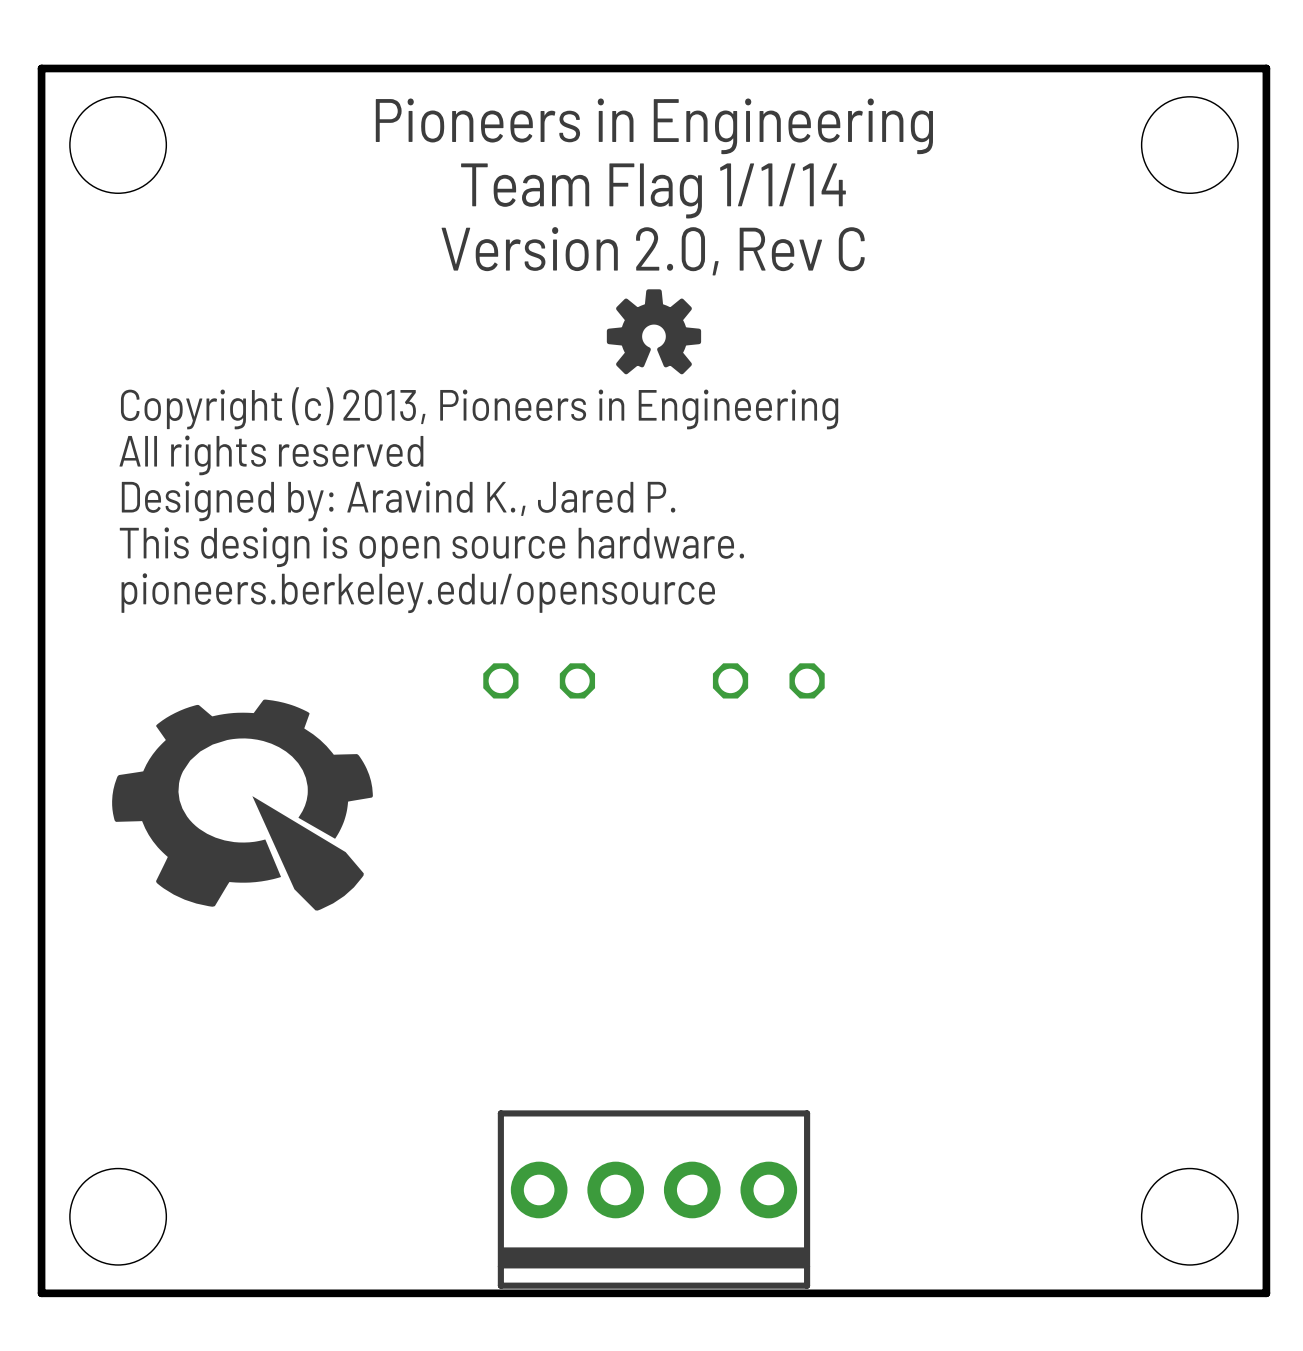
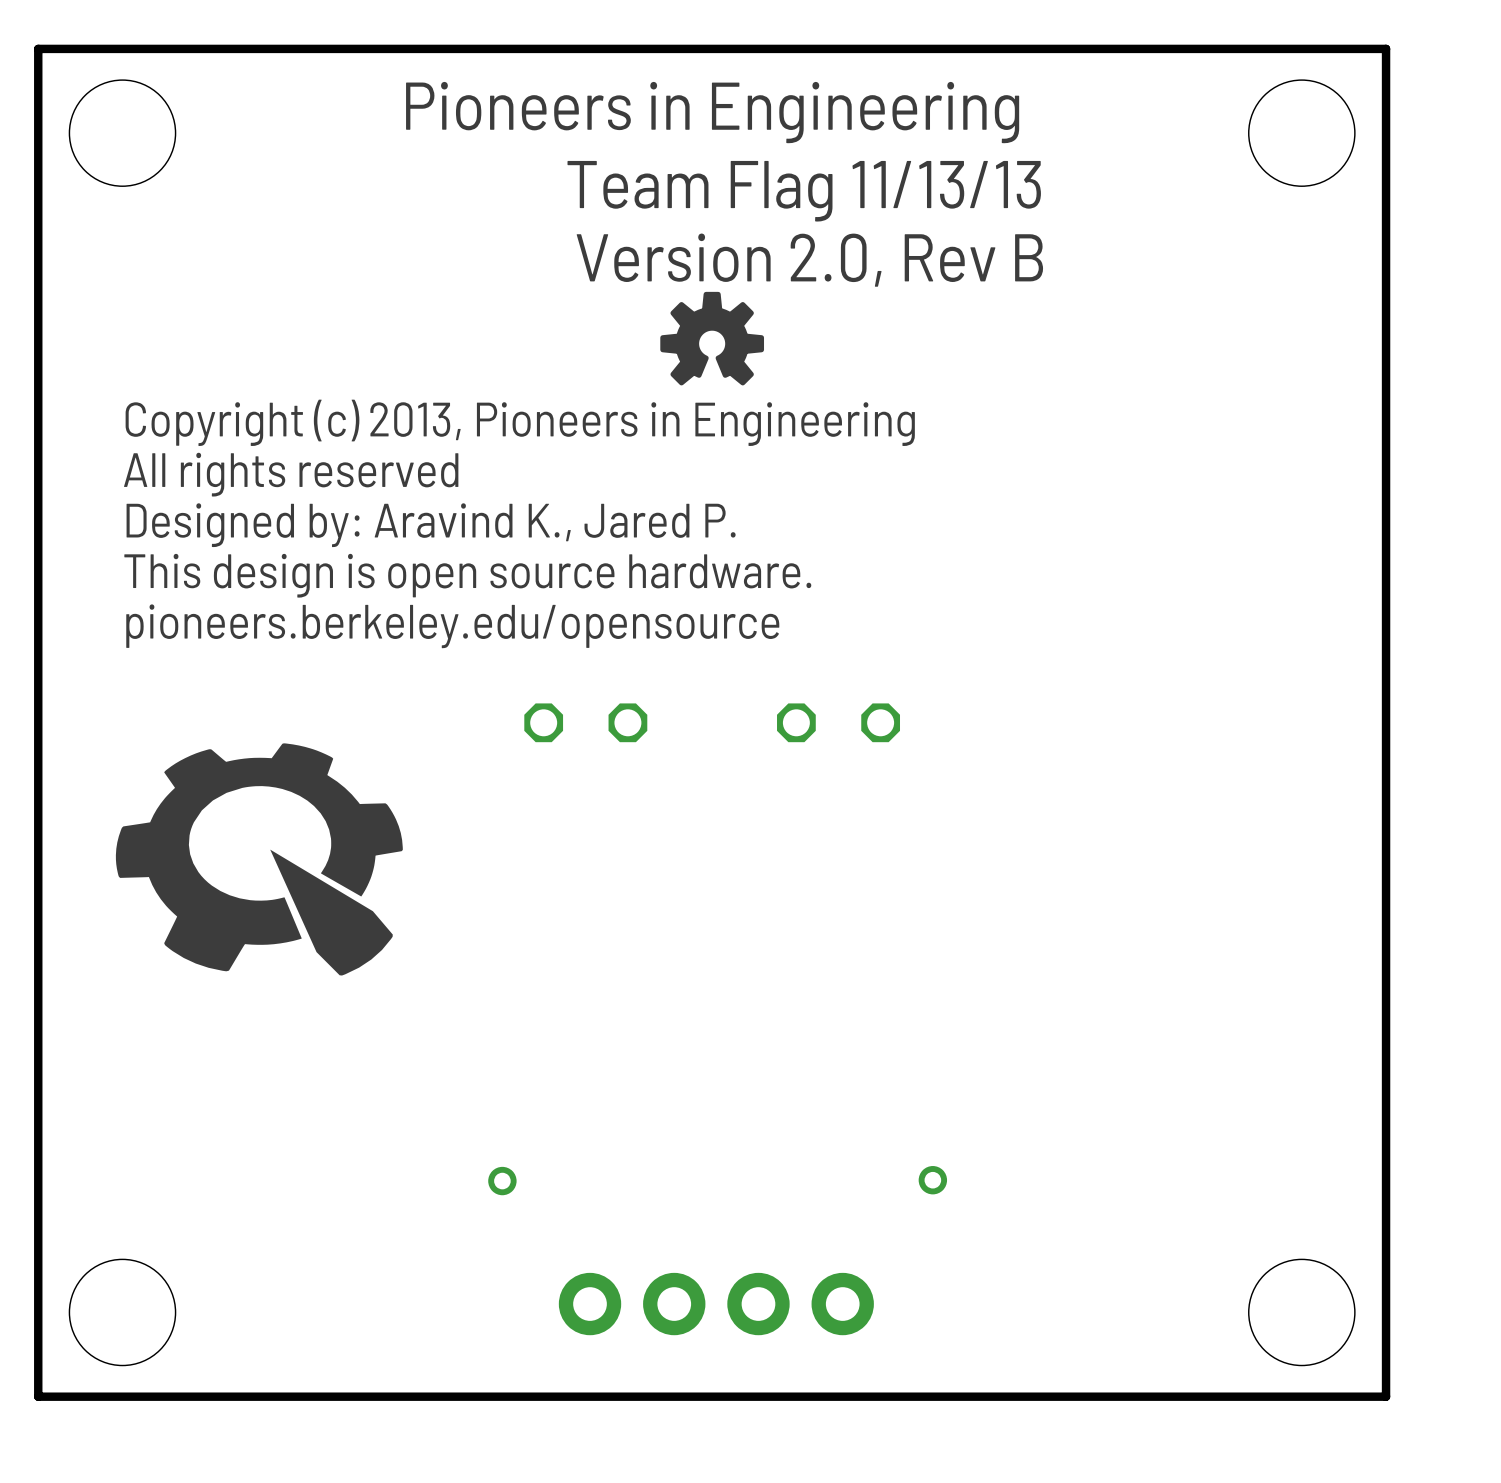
text: Team Flag 1/1/14 (653, 190) -> Team Flag 11/13/13 (804, 191)
text: Version 2.0, Rev C (653, 251) -> Version 2.0, Rev B (809, 260)
via: none -> (932, 1180)
via: none -> (502, 1181)
part side: bottom (653, 1199) -> top (716, 1304)

